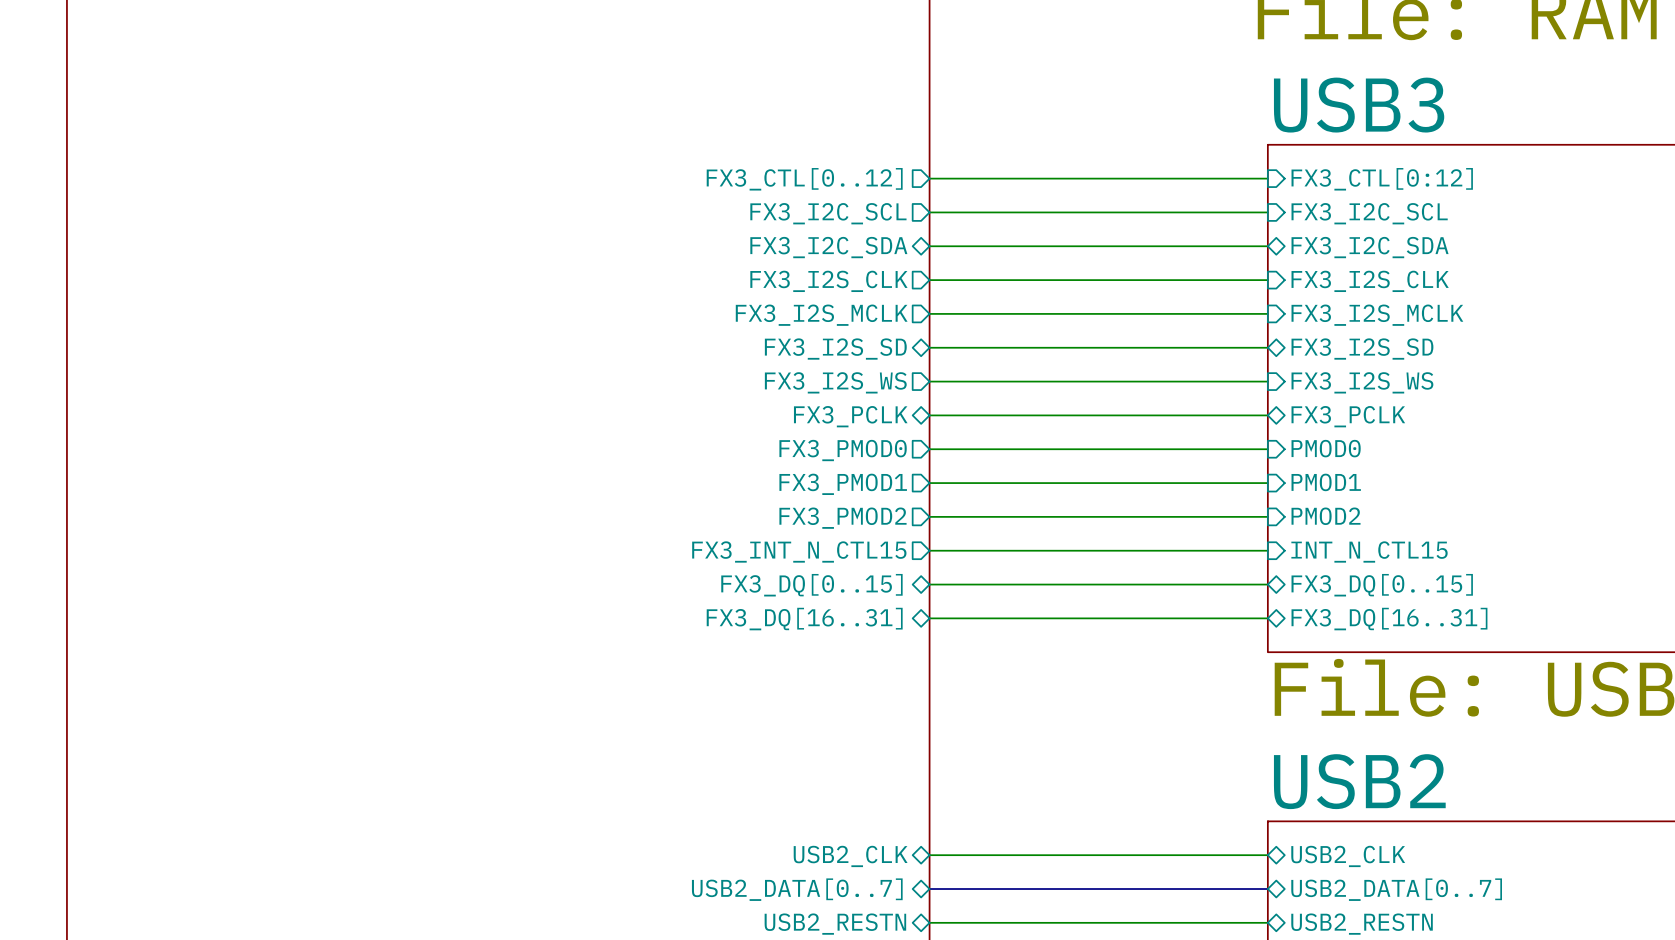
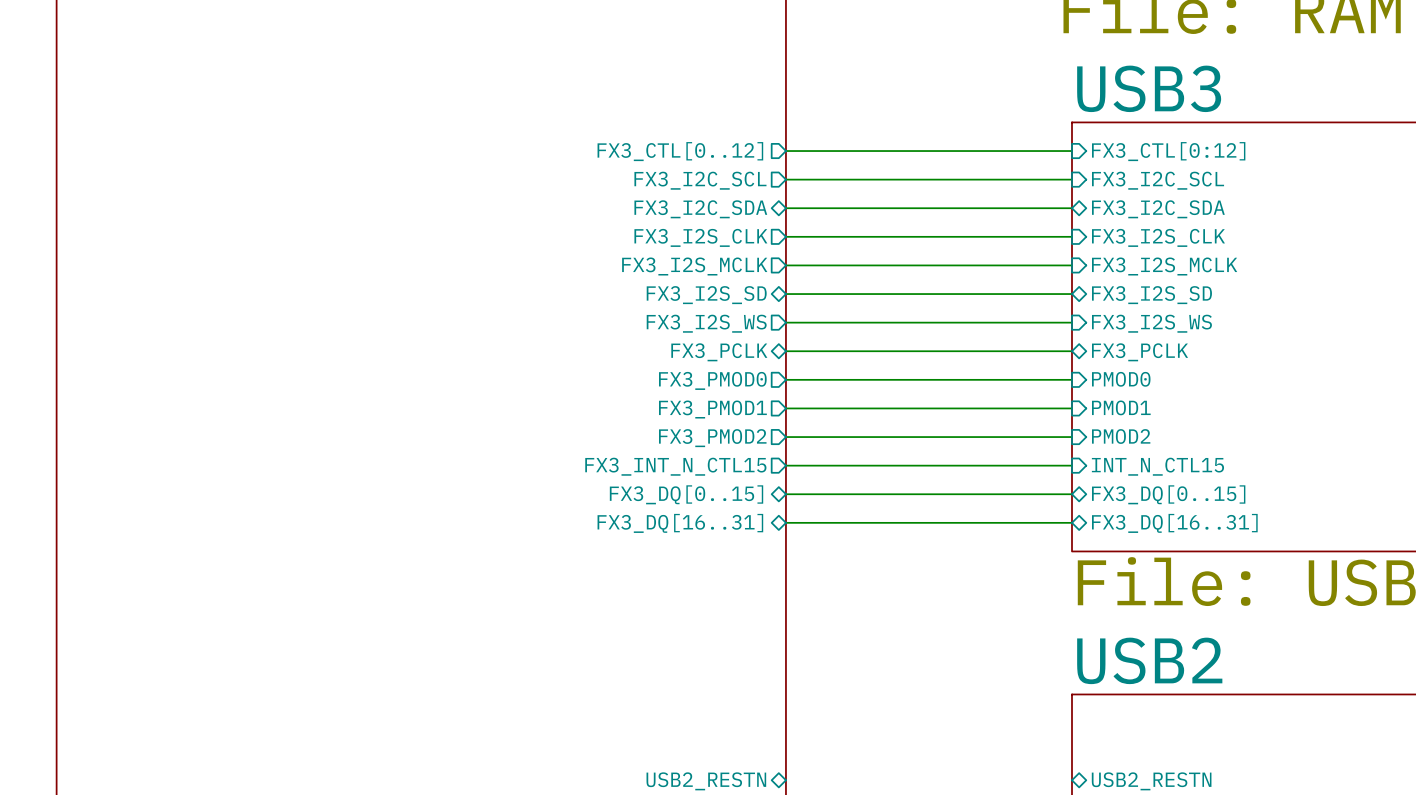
wire: (929, 855) (1267, 855) -> none
sheet pin: USB2_CLK (850, 856) -> none
sheet pin: USB2_CLK (1348, 856) -> none
sheet pin: USB2_DATA[0..7] (797, 889) -> none
bus: (929, 889) (1267, 889) -> none
sheet pin: USB2_DATA[0..7] (1396, 889) -> none
wire: (929, 922) (1267, 922) -> none

